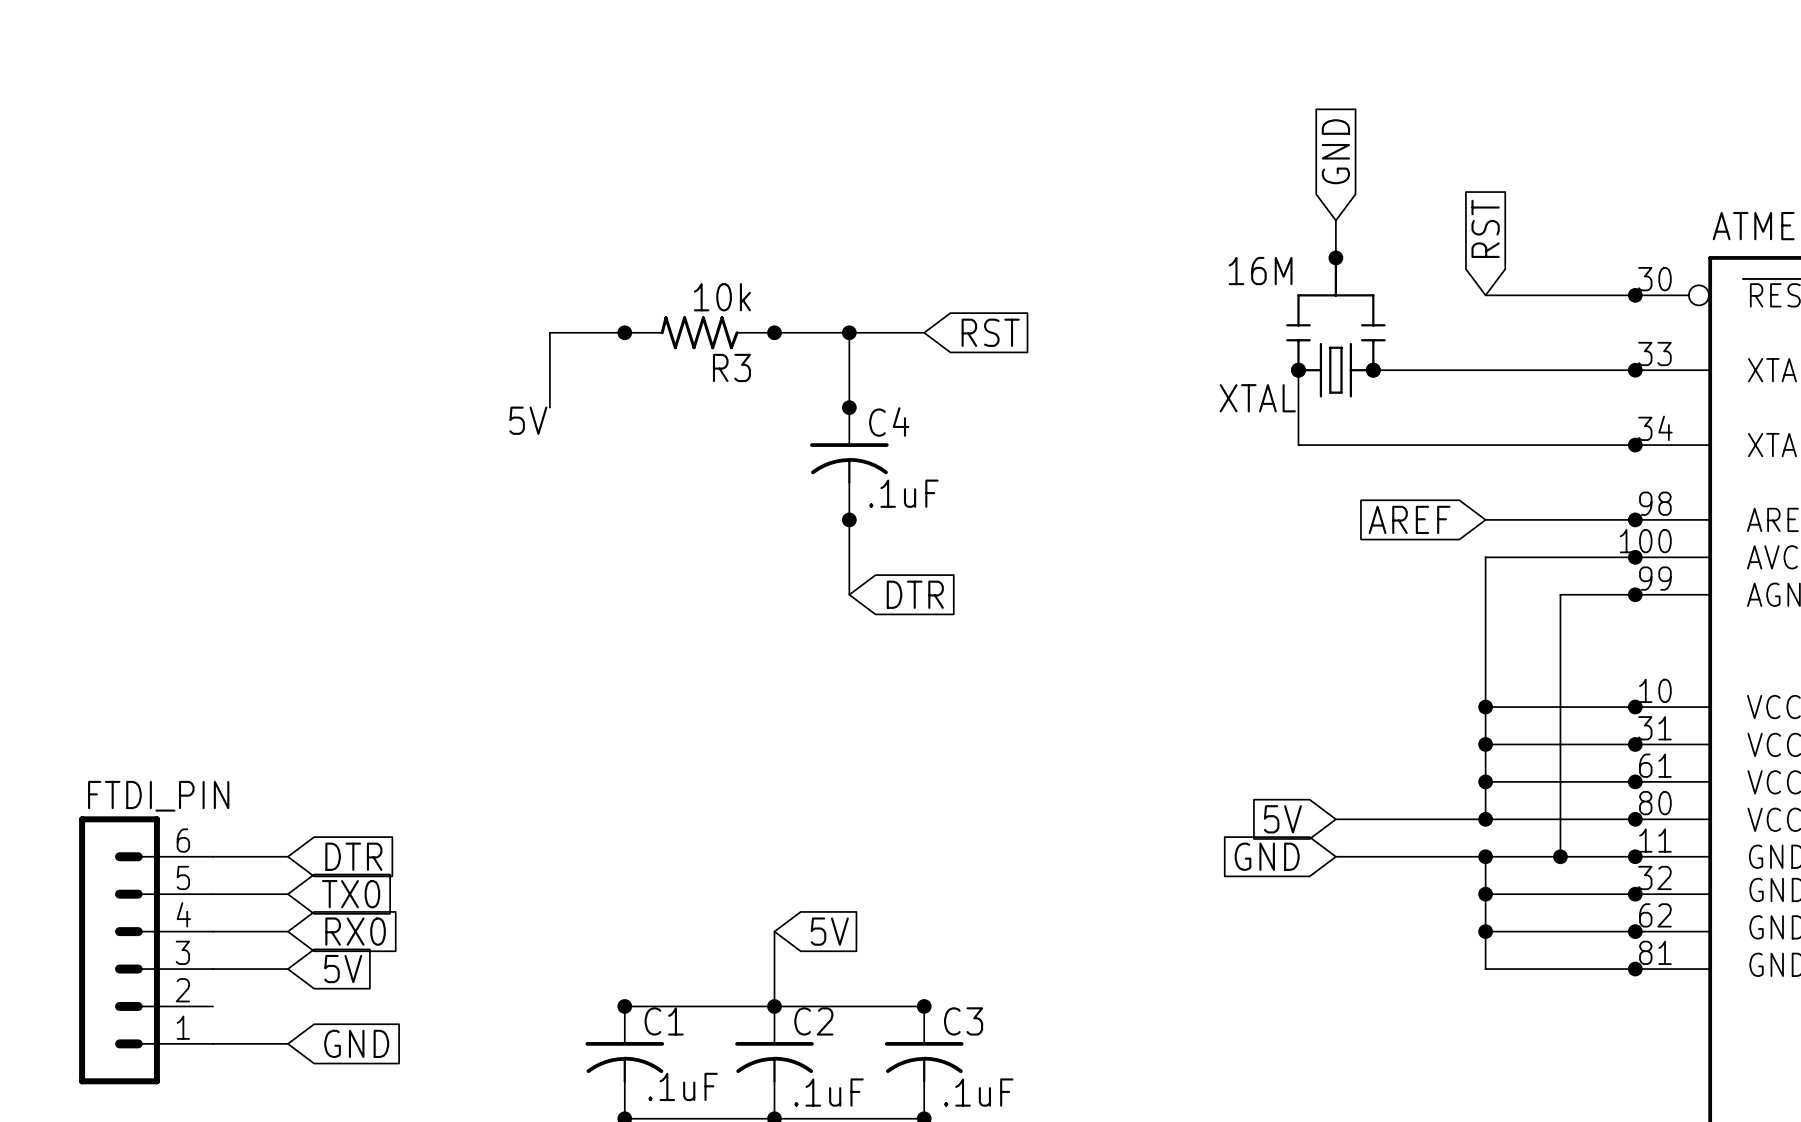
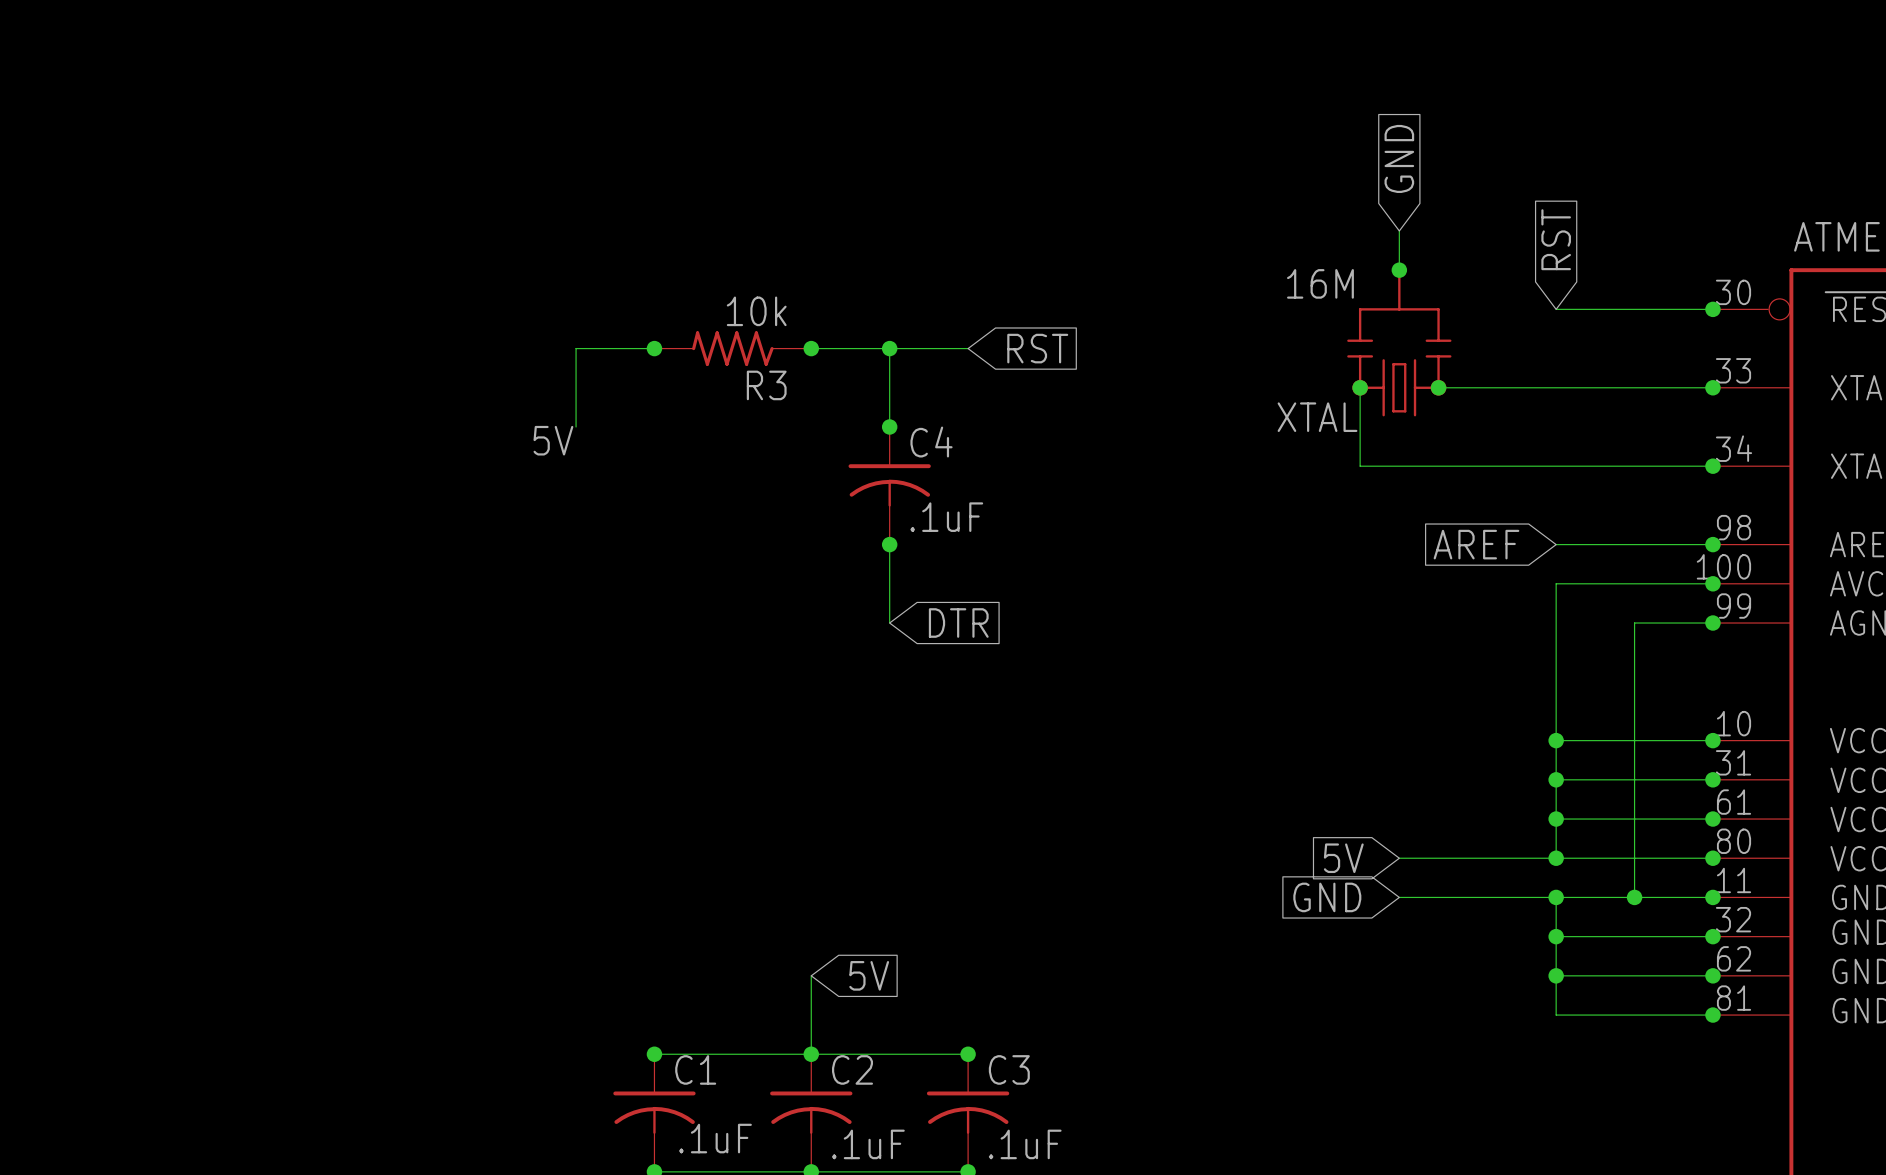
wire: (213, 856) (287, 856) -> none
global label: DTR (353, 856) -> none
wire: (213, 894) (287, 894) -> none
global label: TX0 (351, 894) -> none
wire: (213, 931) (287, 931) -> none
global label: RX0 (355, 931) -> none
FTDI_PIN: (146, 950) -> none
wire: (213, 969) (287, 969) -> none
global label: 5V (343, 969) -> none
wire: (213, 1043) (287, 1043) -> none
global label: GND (356, 1043) -> none

